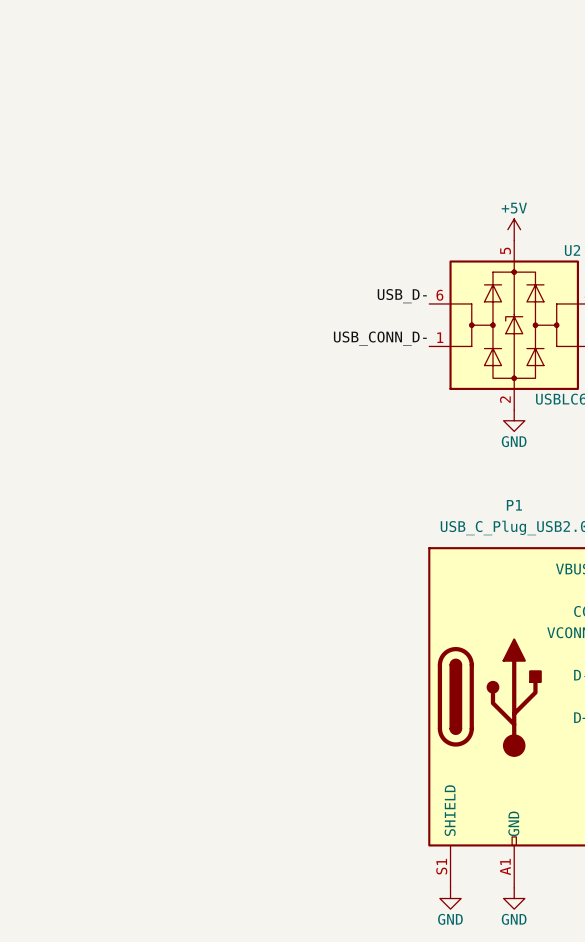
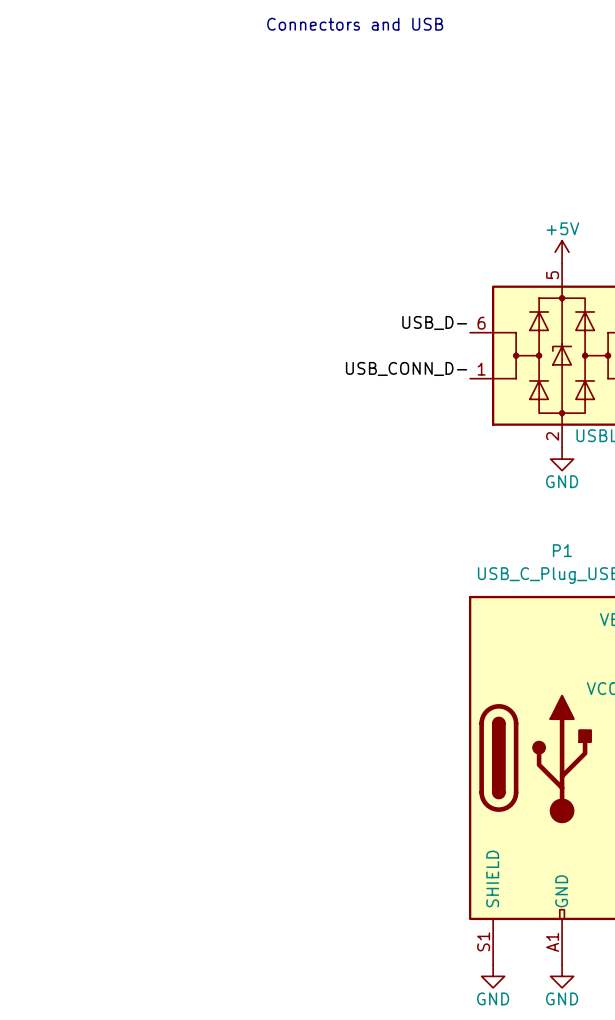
text: none -> Connectors and USB (355, 24)

